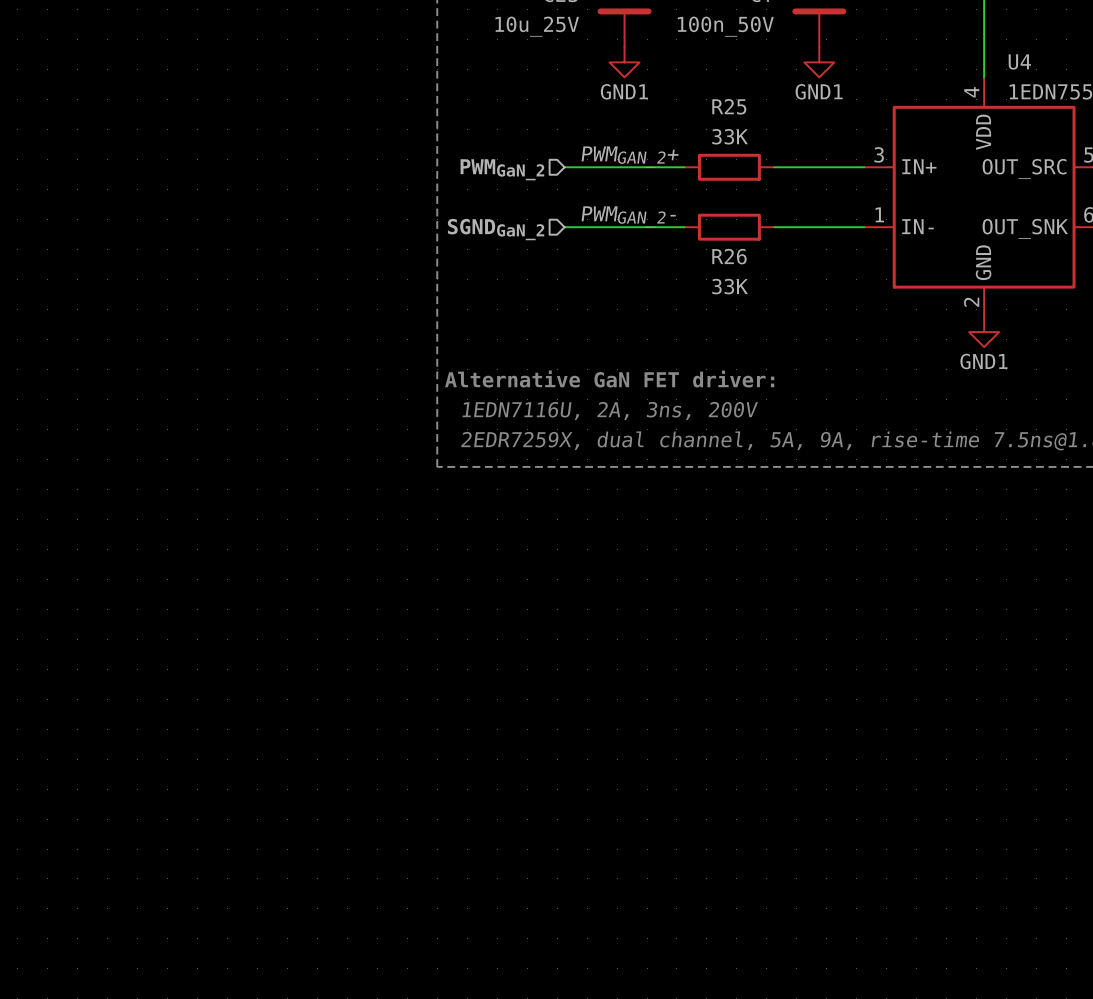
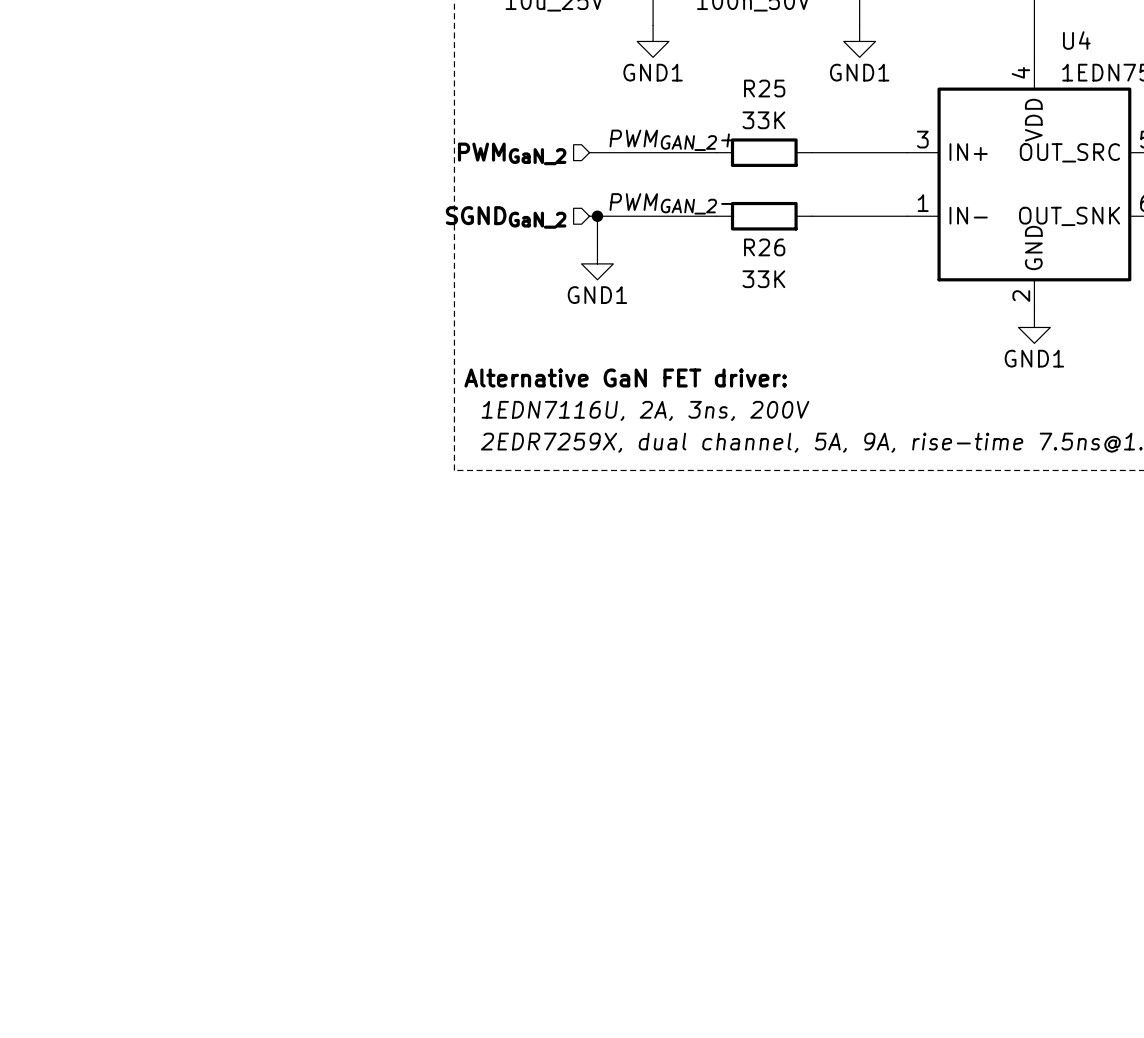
wire: none -> (597, 216) (597, 248)
junction: none -> (597, 216)
power symbol: none -> GND1 (597, 263)

